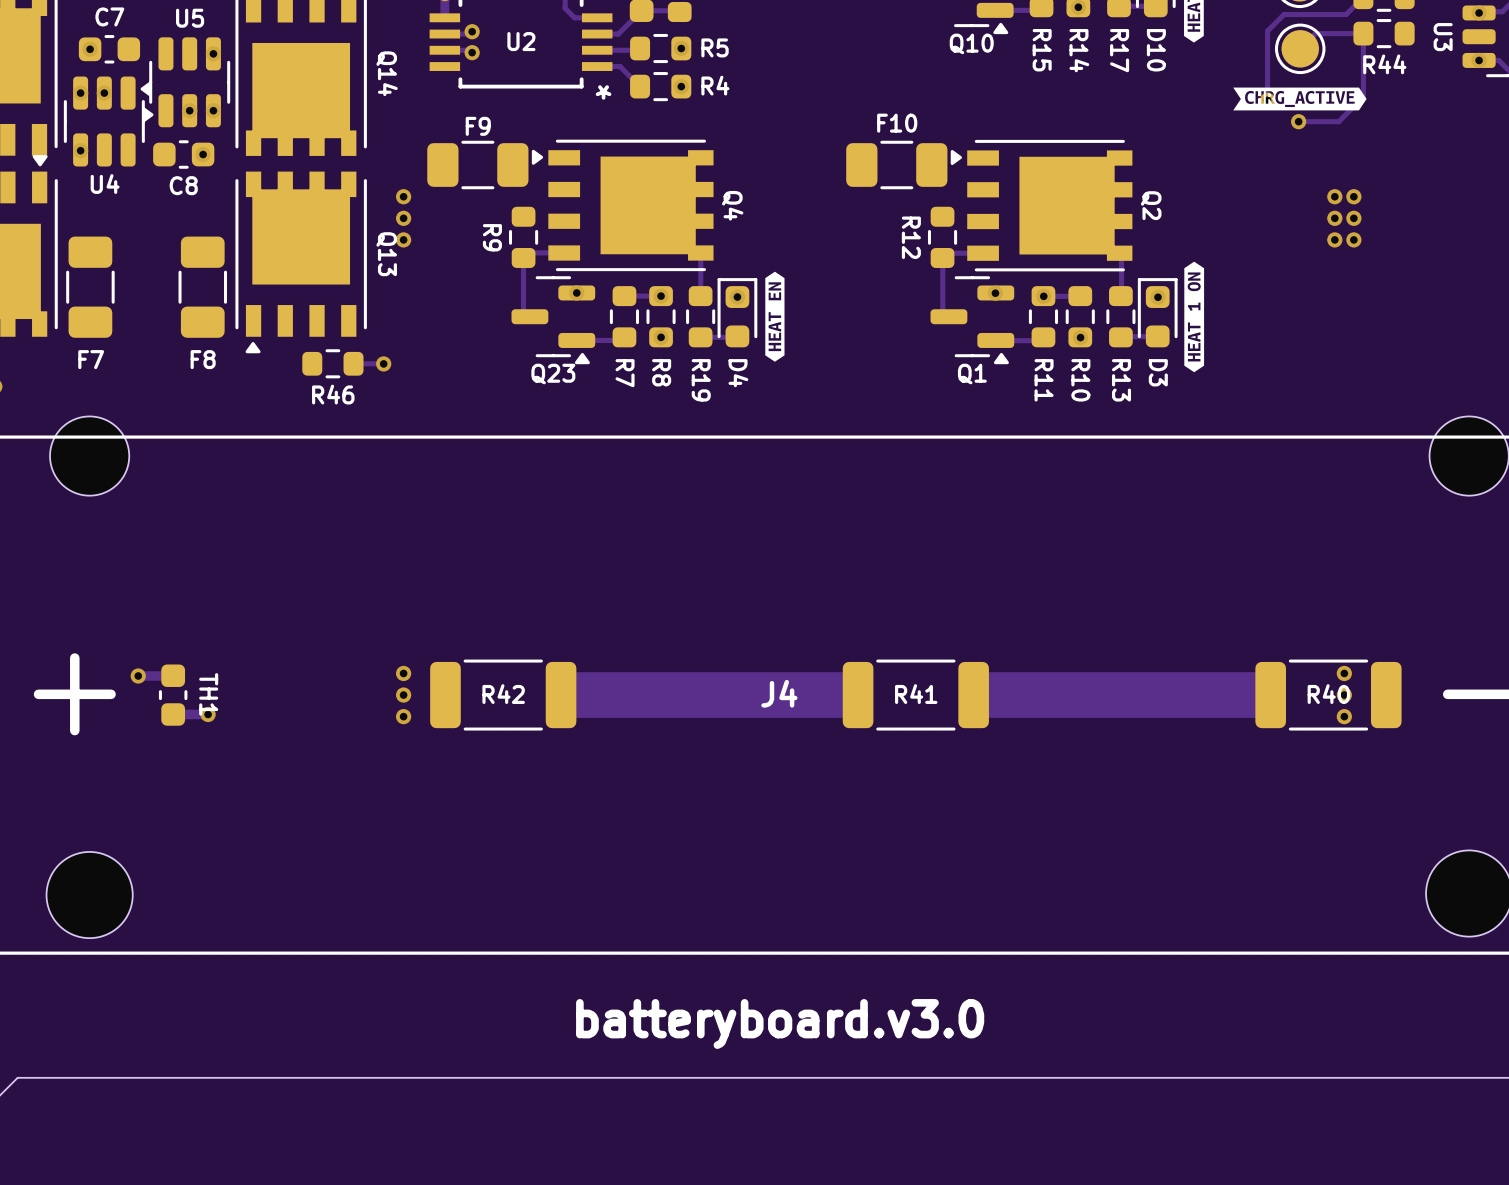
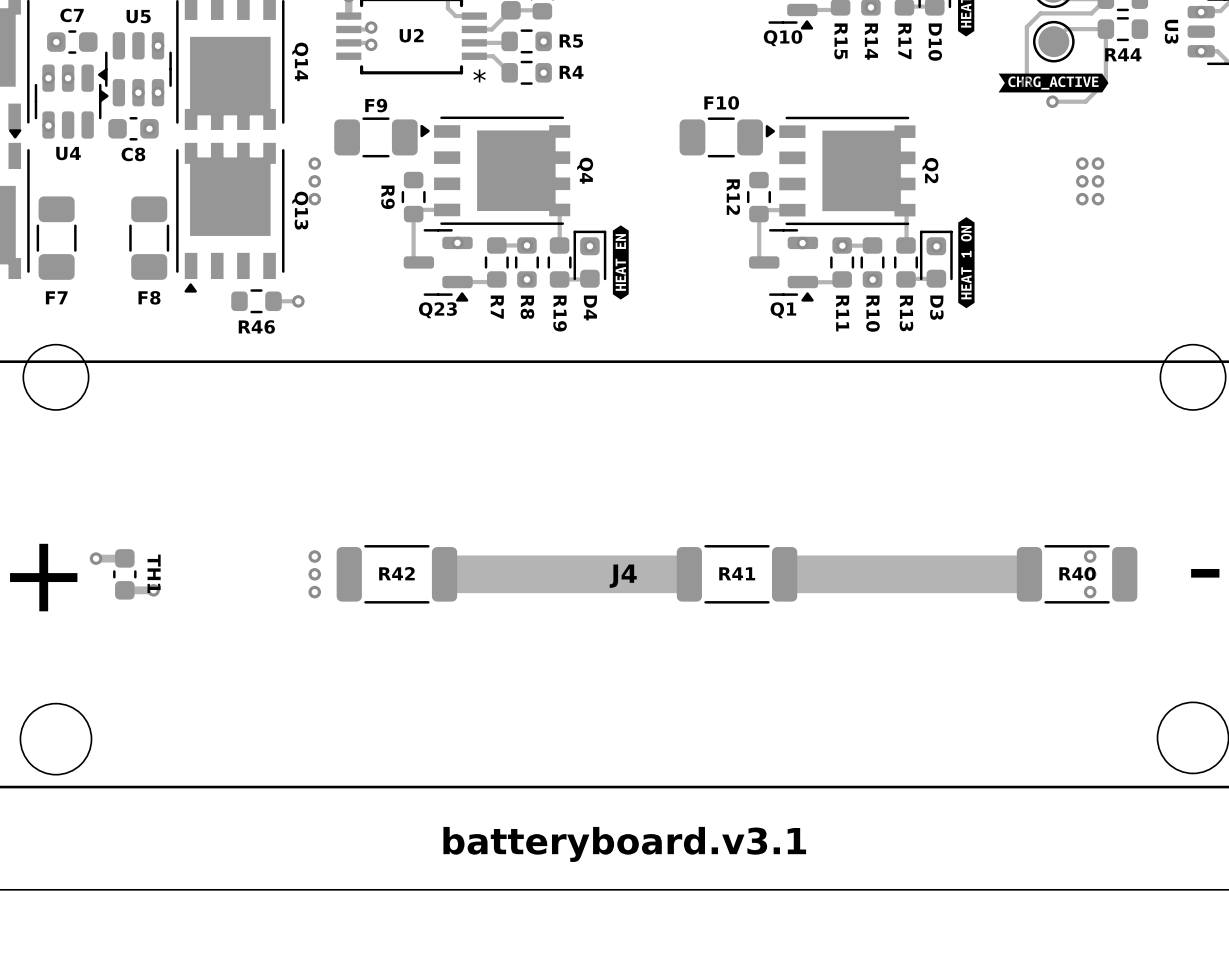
text: batteryboard.v3.0 (780, 1024) -> batteryboard.v3.1 (624, 844)

